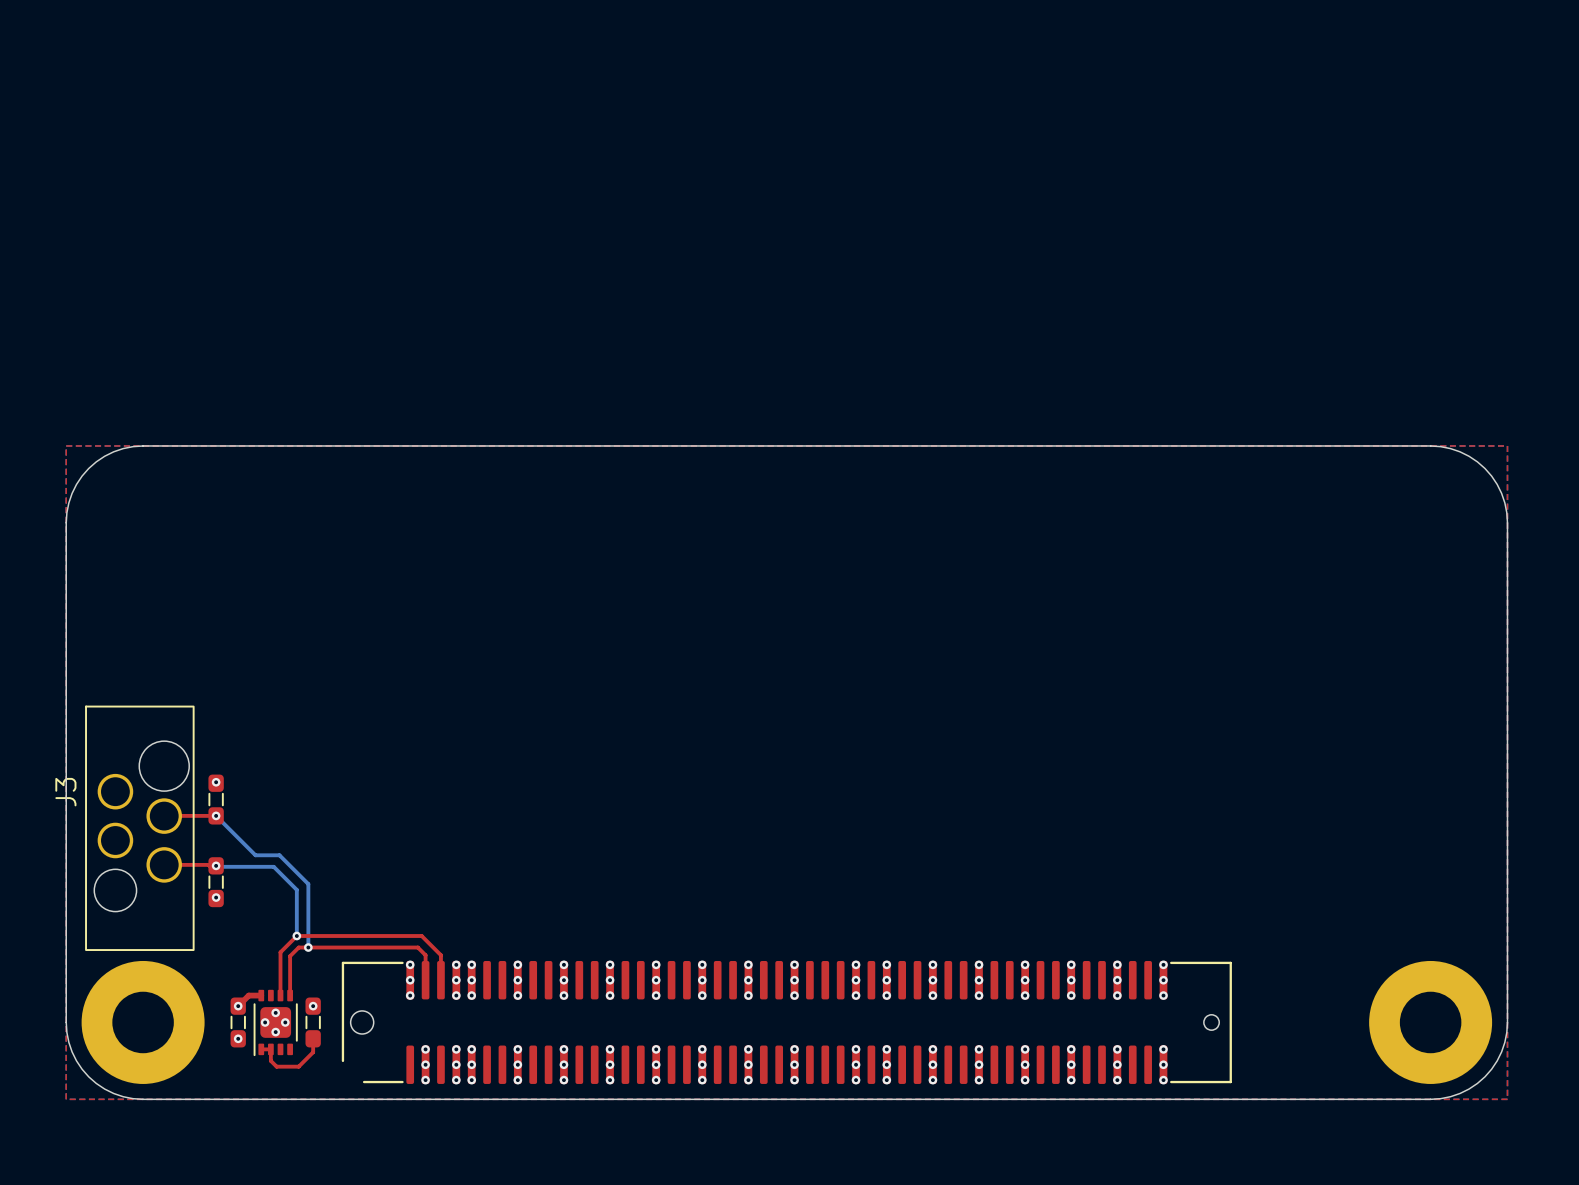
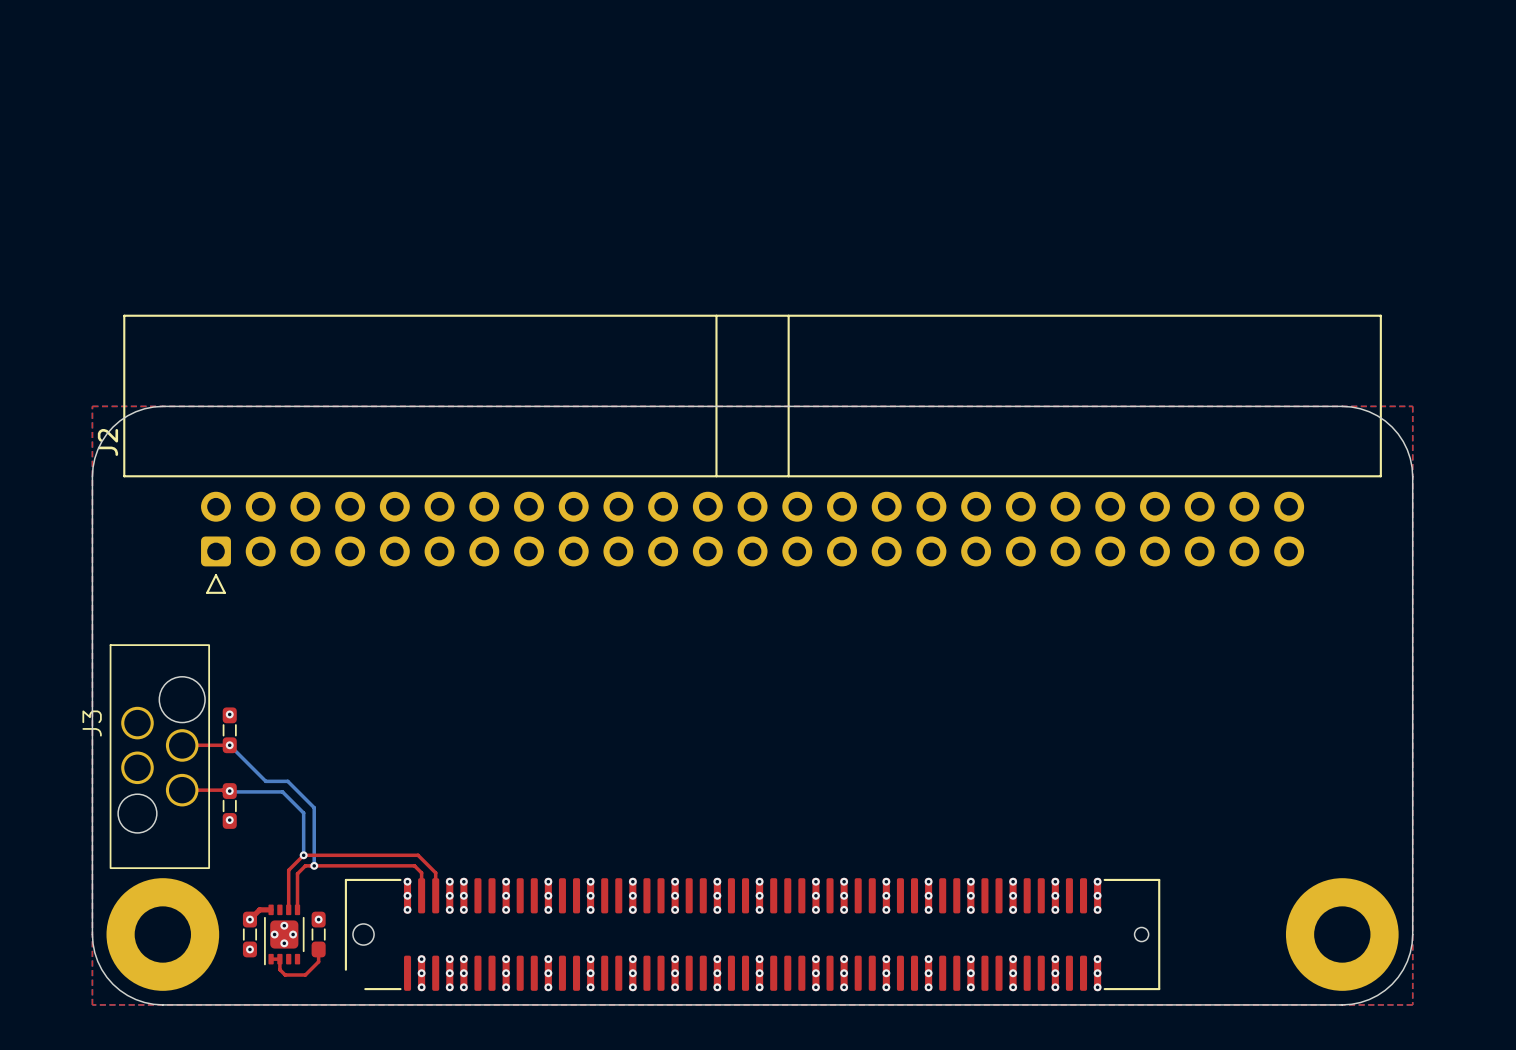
J2: none -> (752, 454)

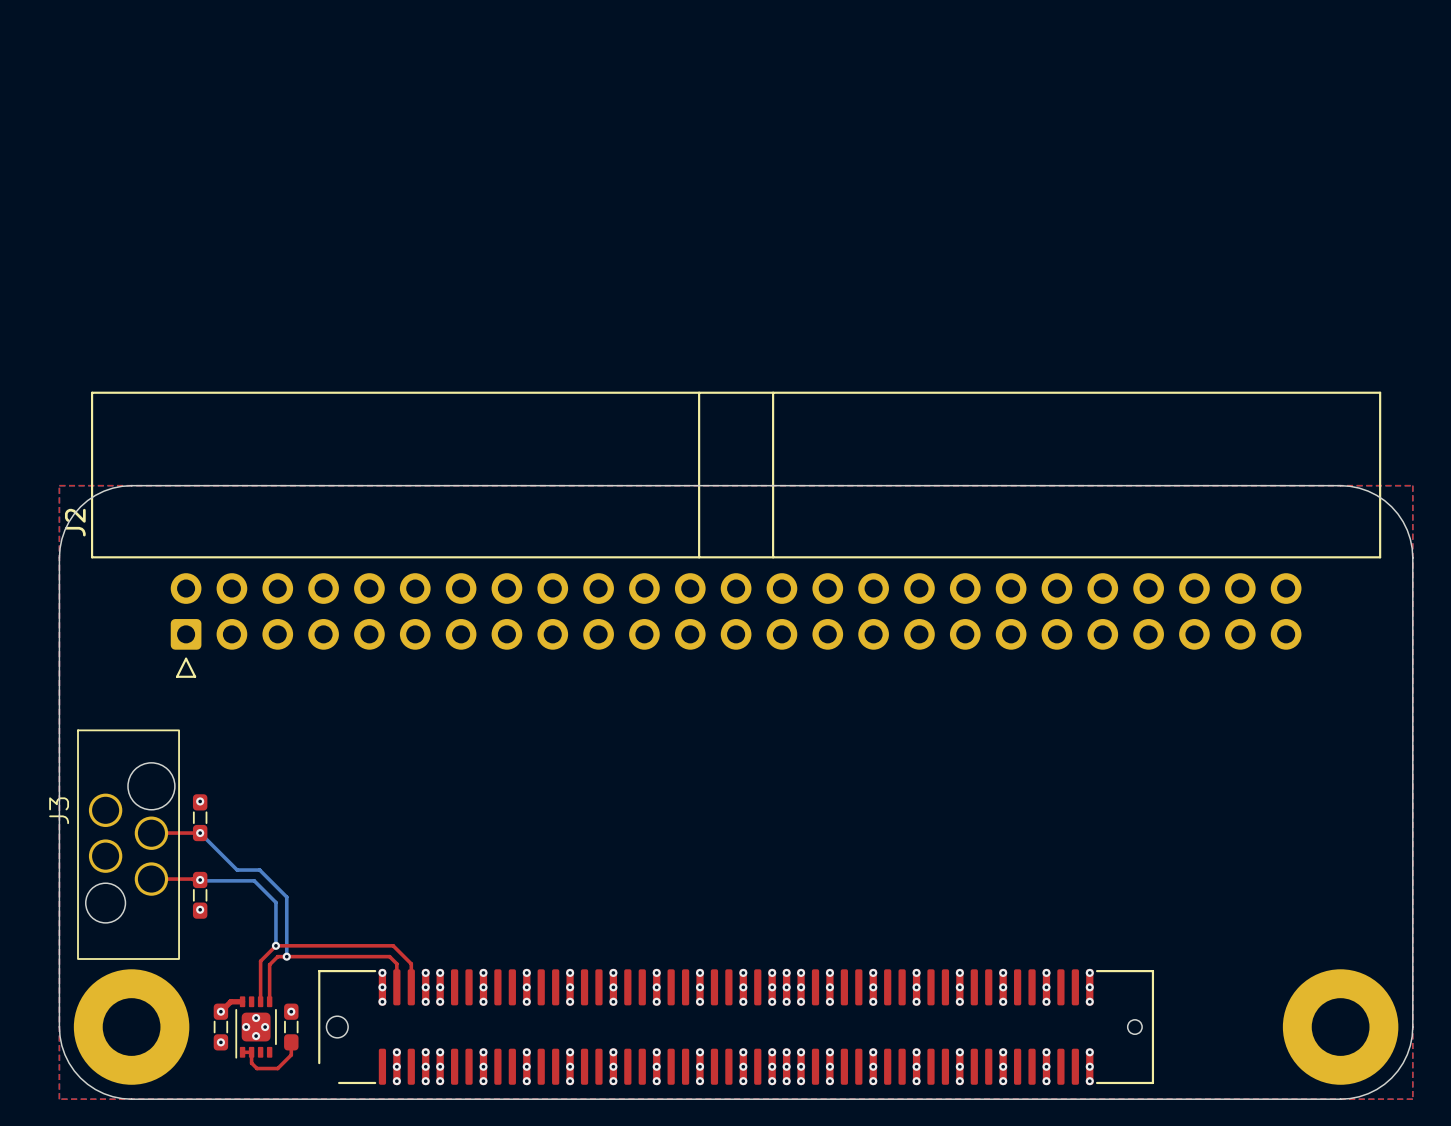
via: none -> (772, 972)
via: none -> (786, 972)
via: none -> (772, 987)
via: none -> (786, 987)
via: none -> (772, 1001)
via: none -> (786, 1001)
via: none -> (772, 1052)
via: none -> (786, 1052)
via: none -> (772, 1066)
via: none -> (786, 1066)
via: none -> (772, 1081)
via: none -> (786, 1081)

